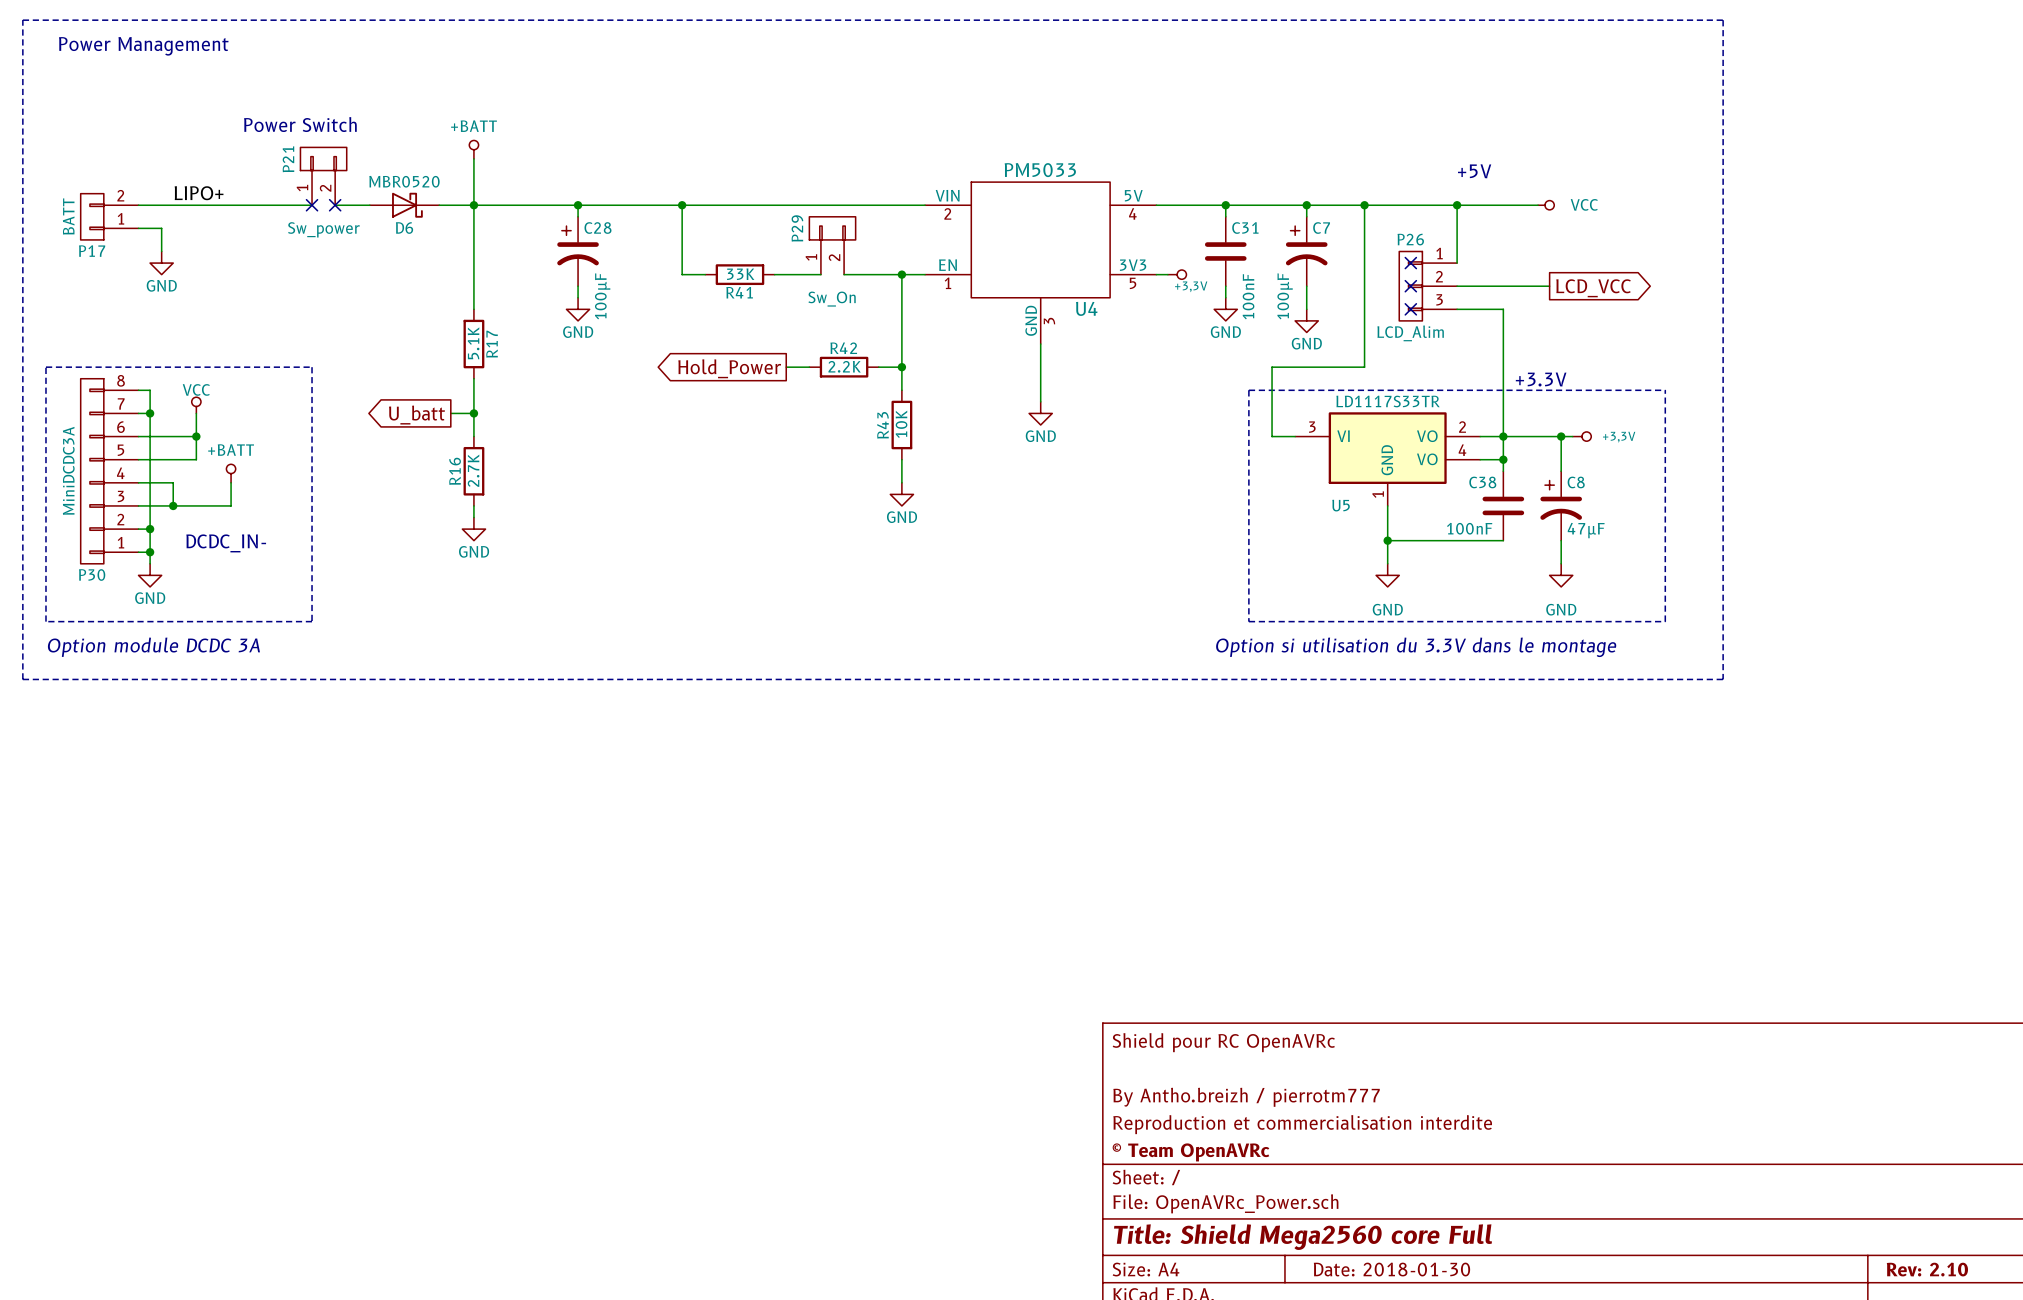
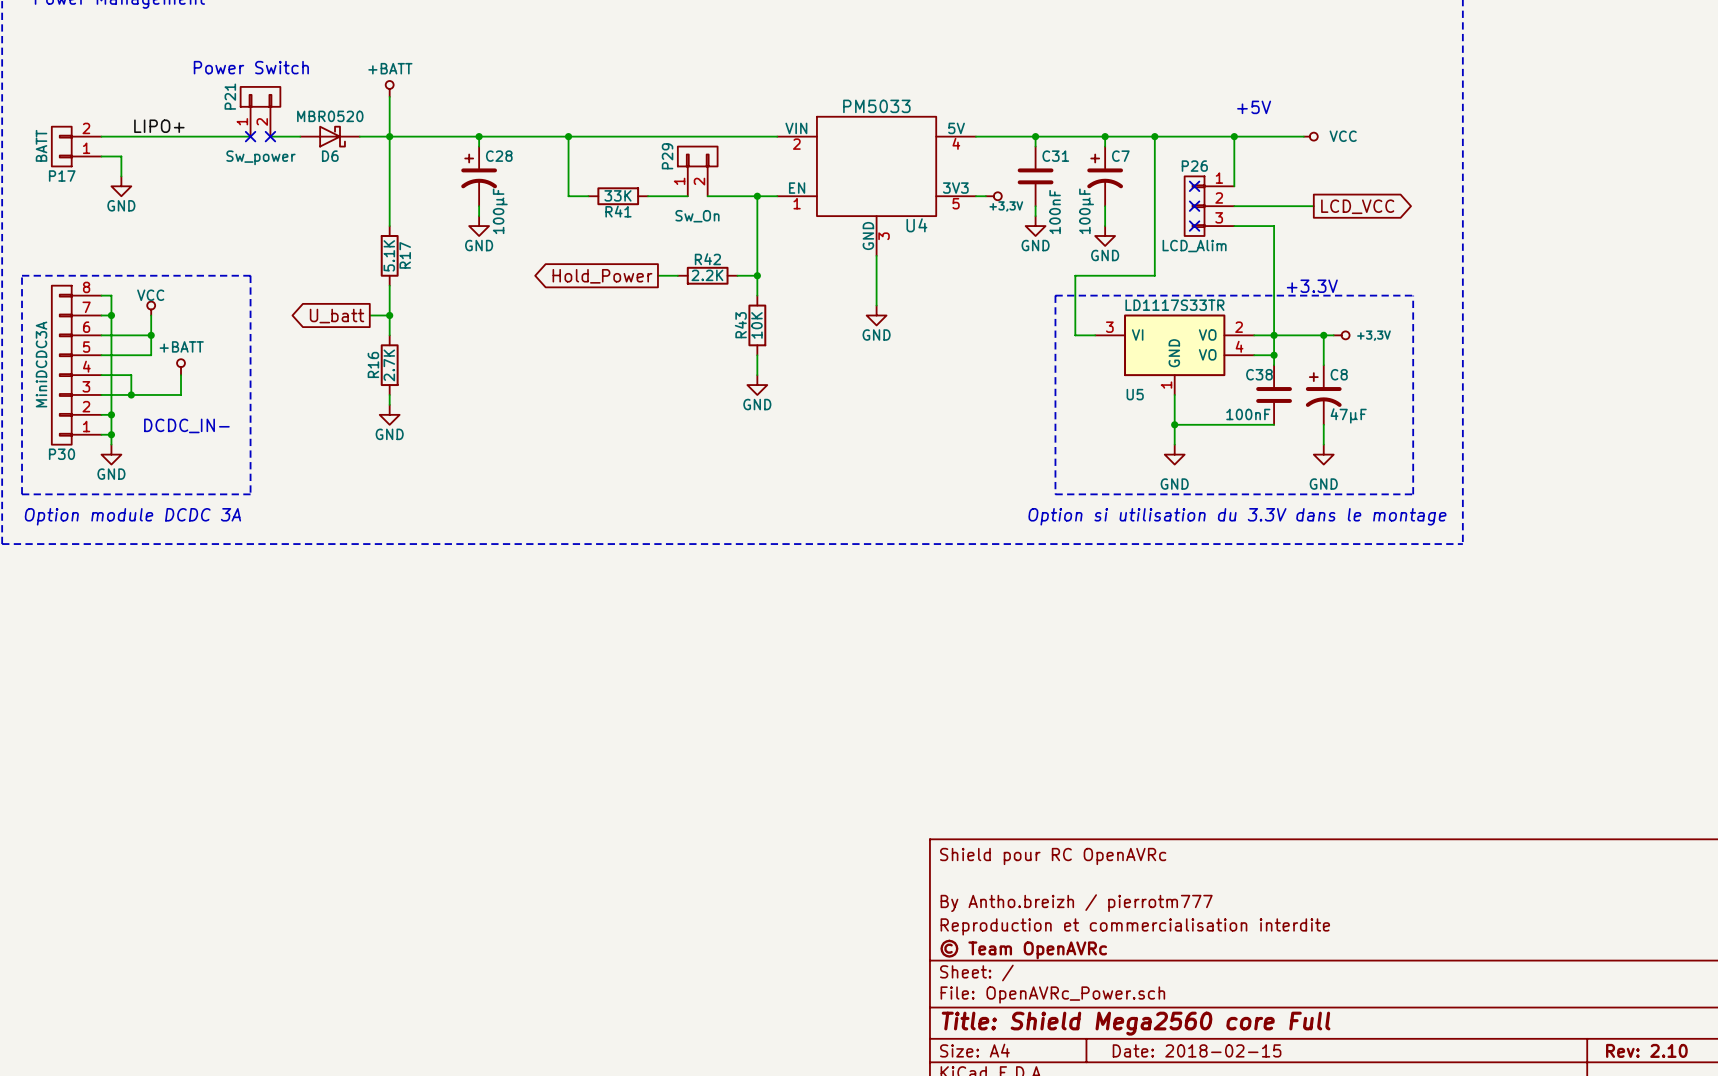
title block: Date: 2018-01-30 (1391, 1269) -> Date: 2018-02-15 (1197, 1050)

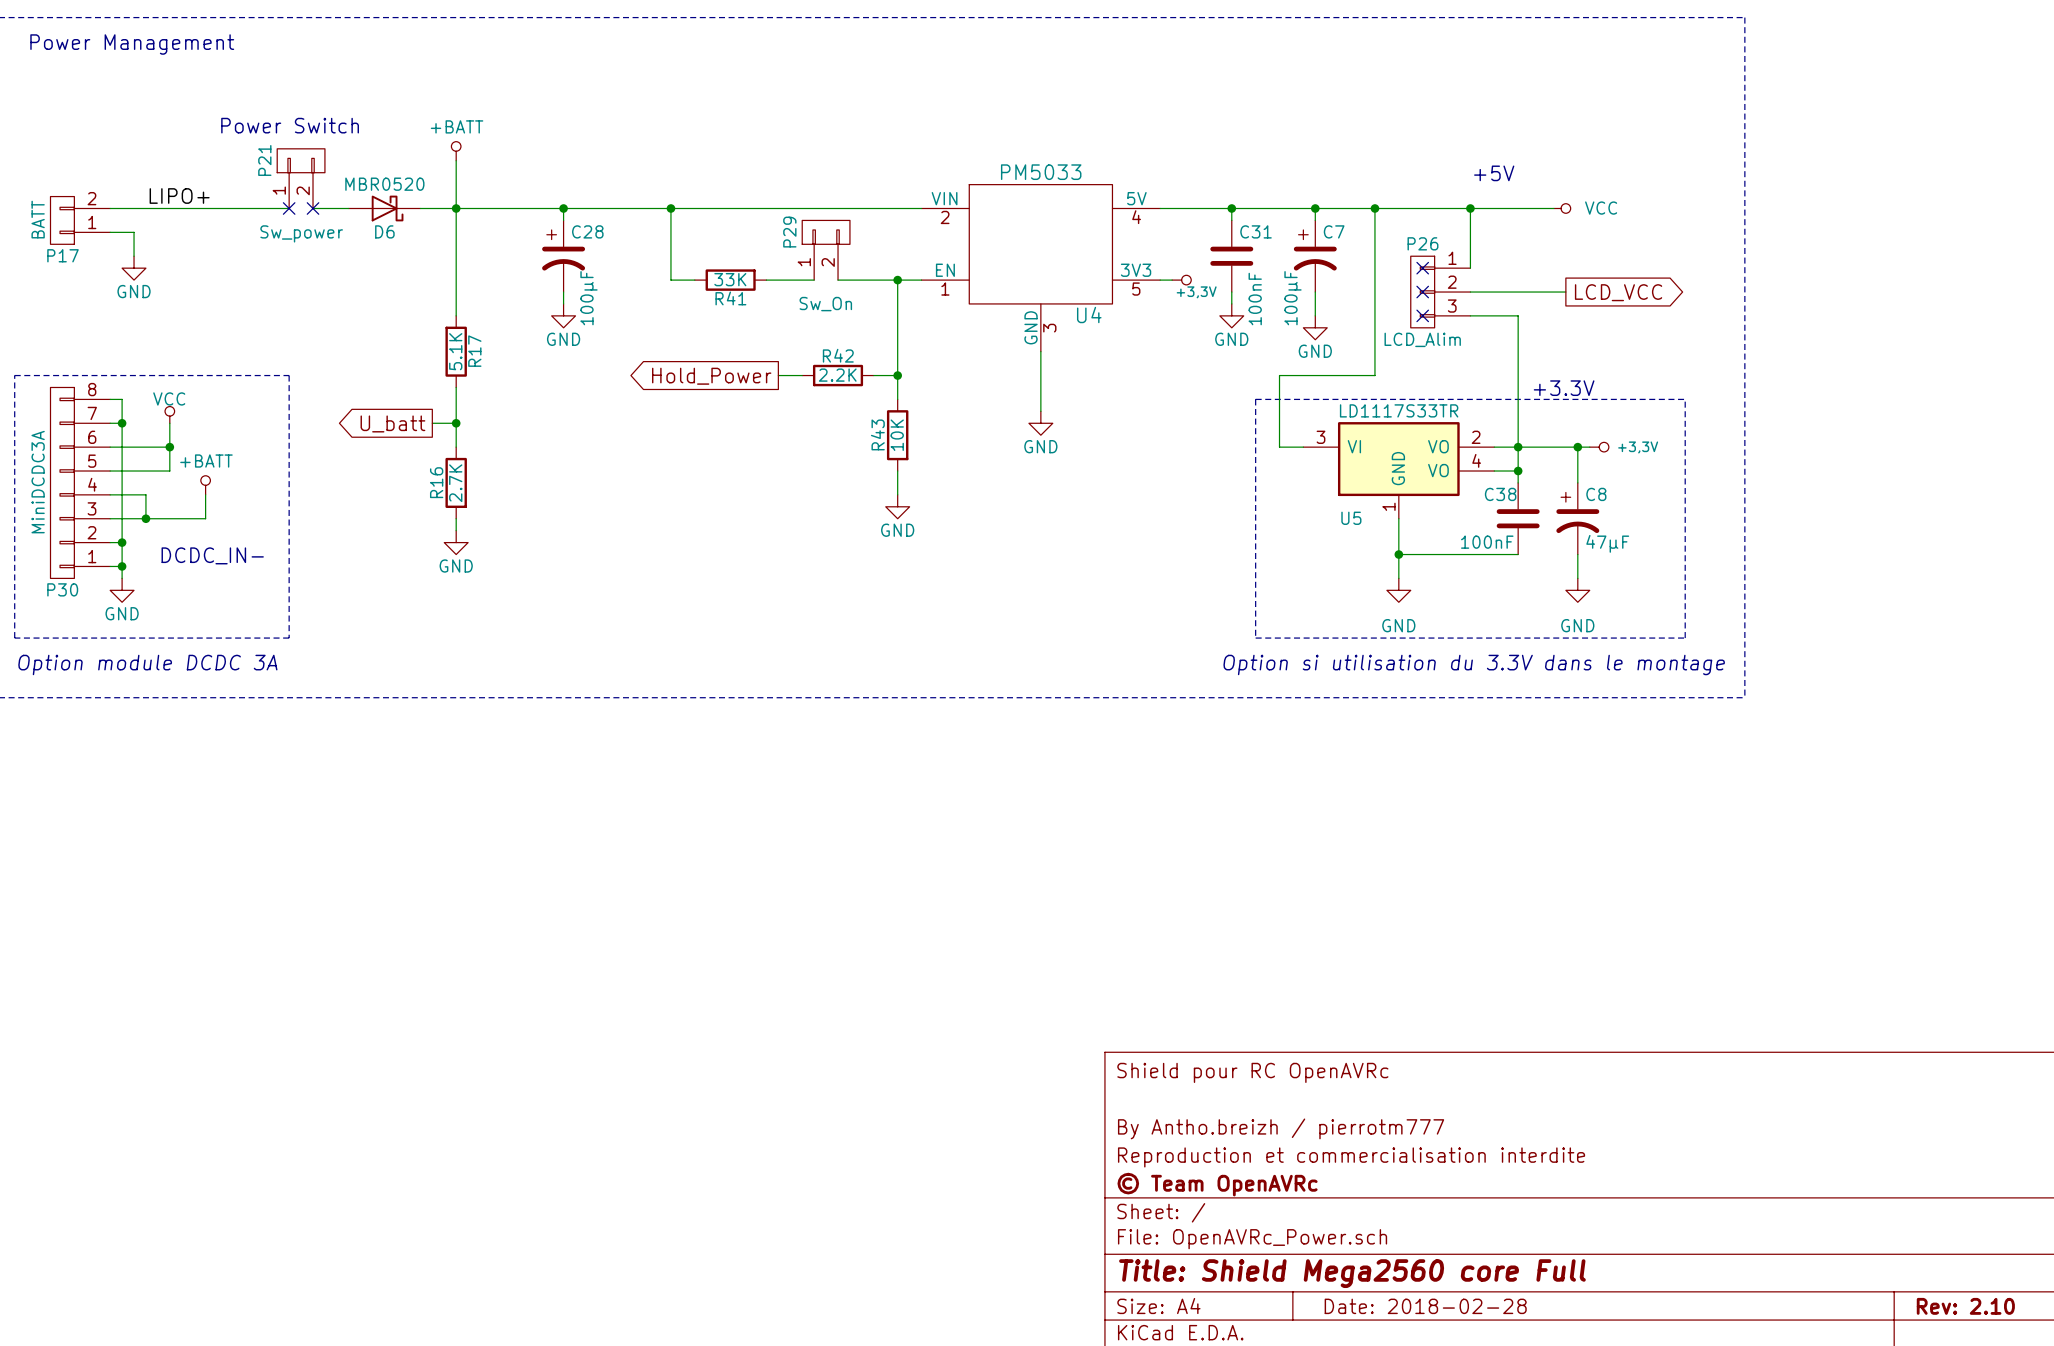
title block: Date: 2018-02-15 (1197, 1050) -> Date: 2018-02-28 (1425, 1306)

